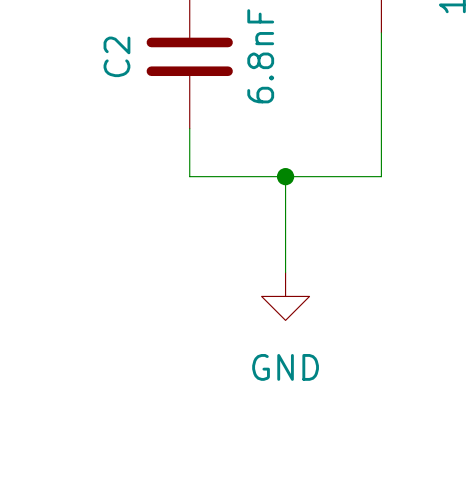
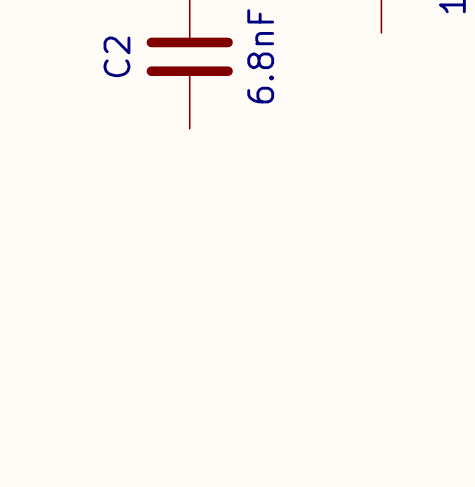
wire: (381, 32) (381, 176) (189, 176) (189, 128) -> none
wire: (285, 176) (285, 272) -> none
junction: (285, 176) -> none
power symbol: GND (285, 296) -> none

